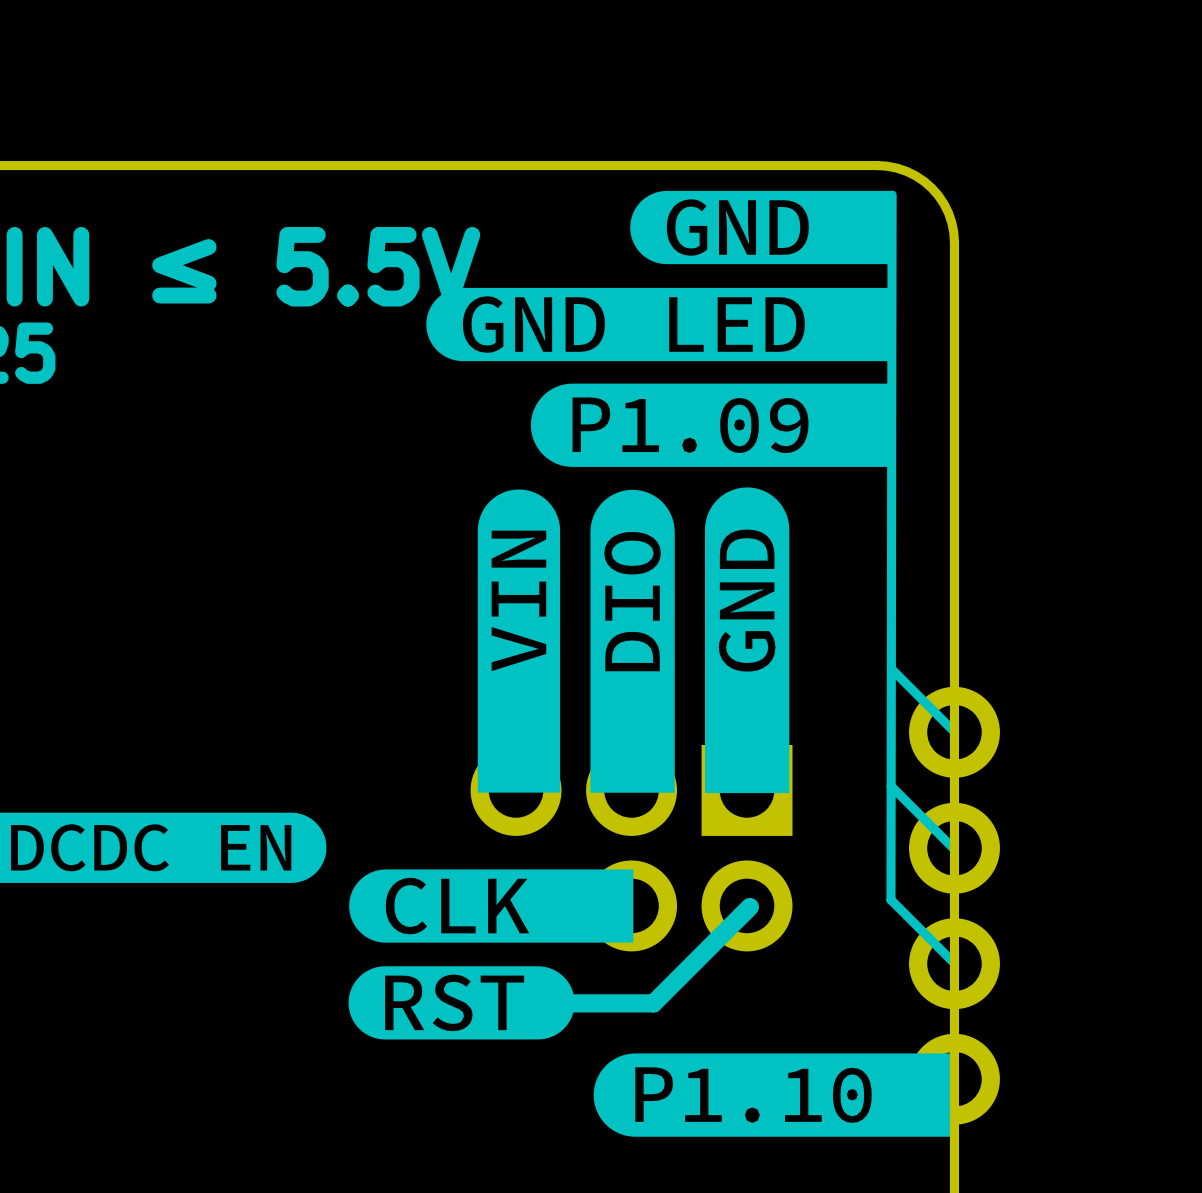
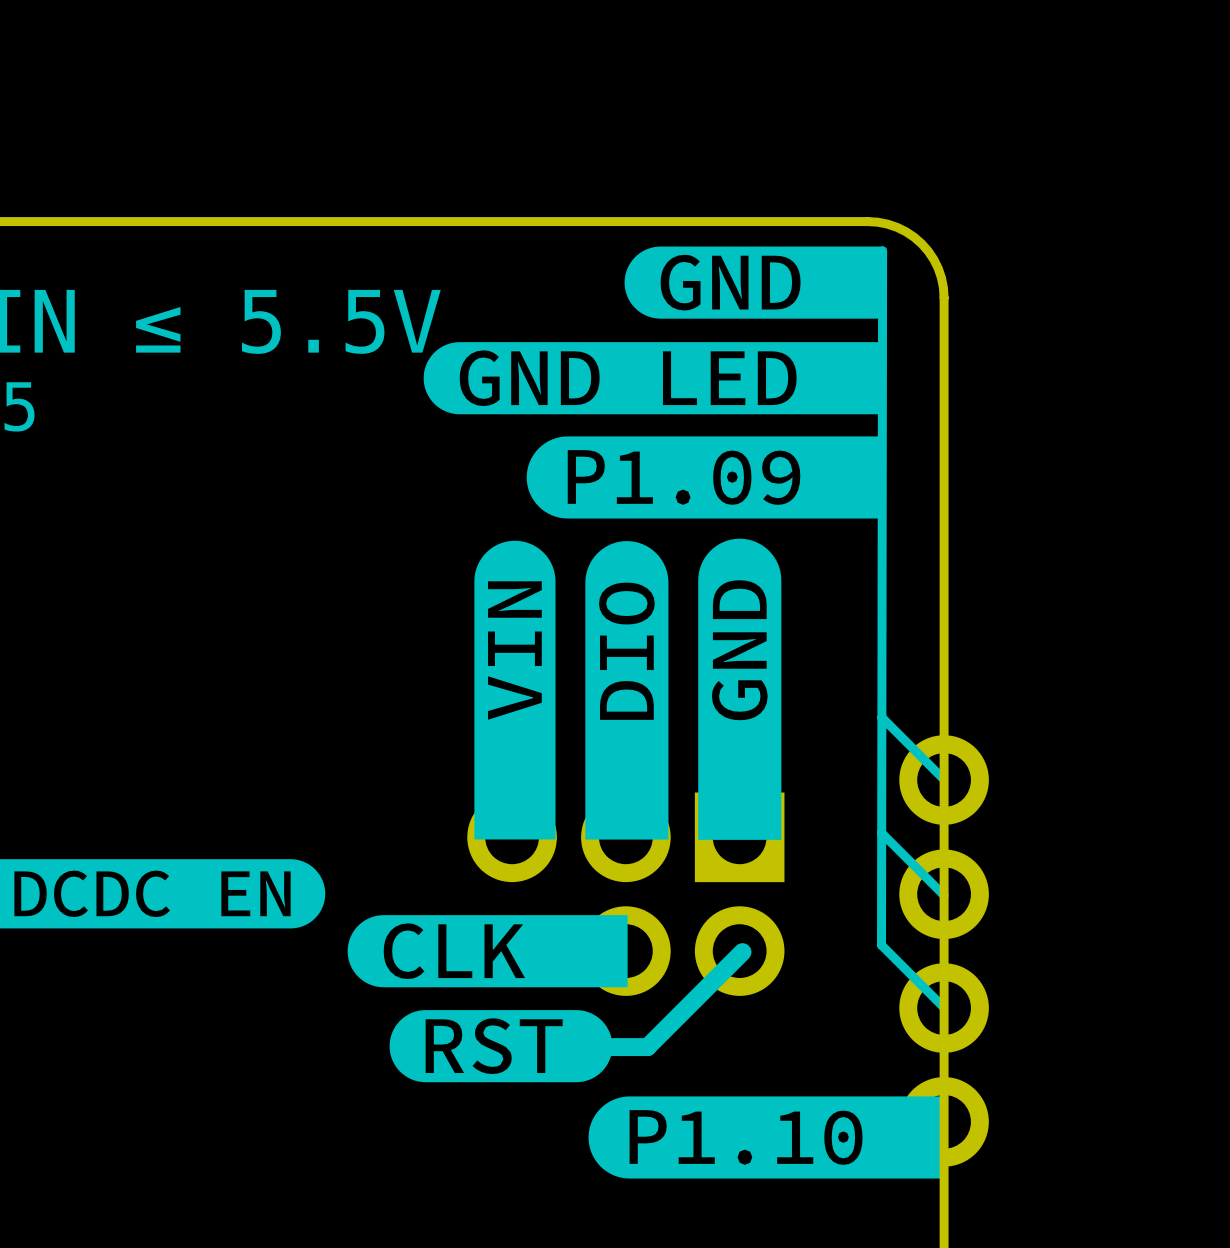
drawing position: (461, 1002) -> (500, 1046)

